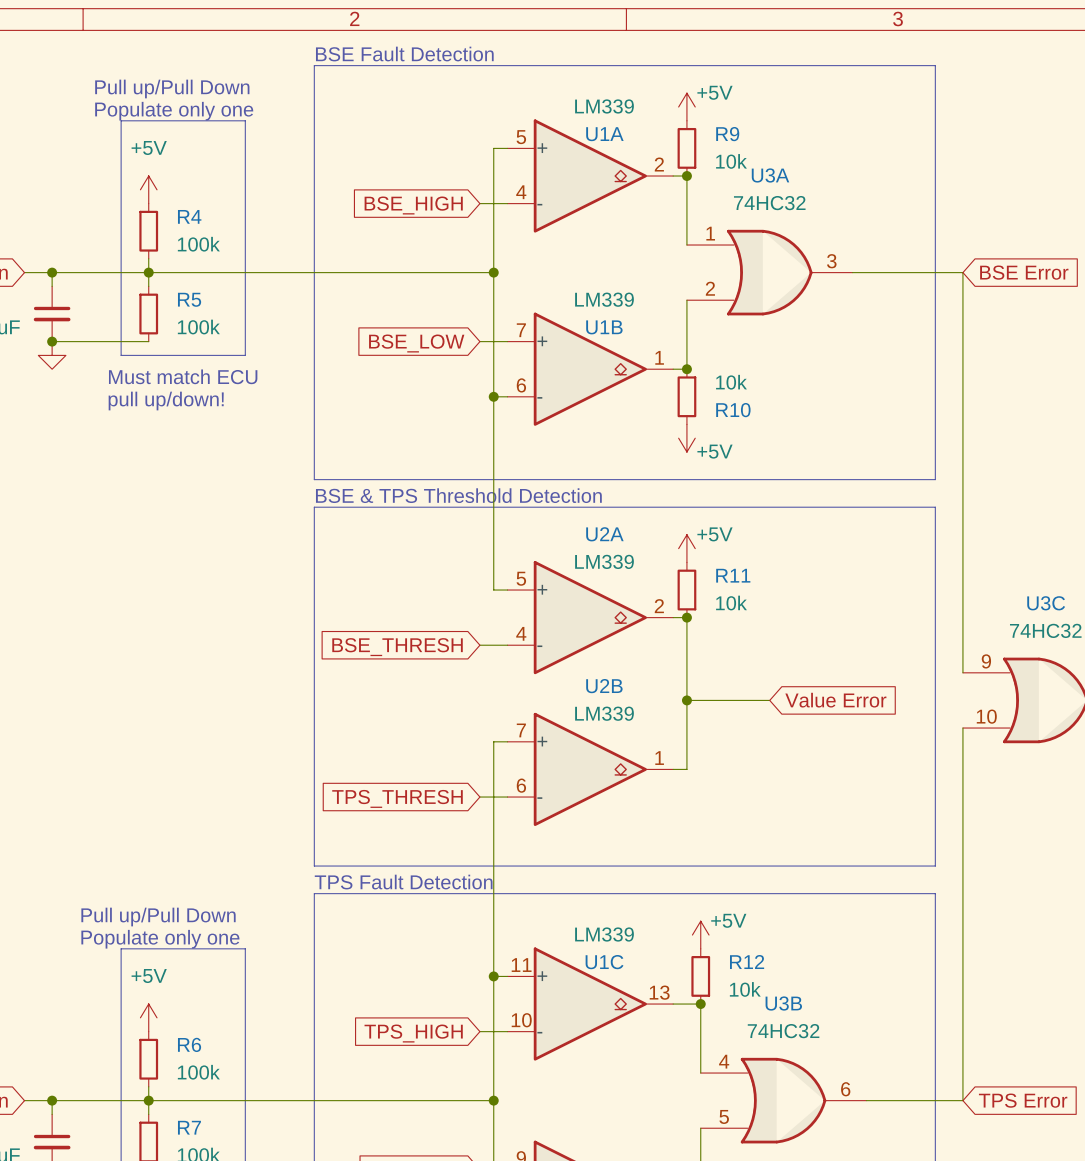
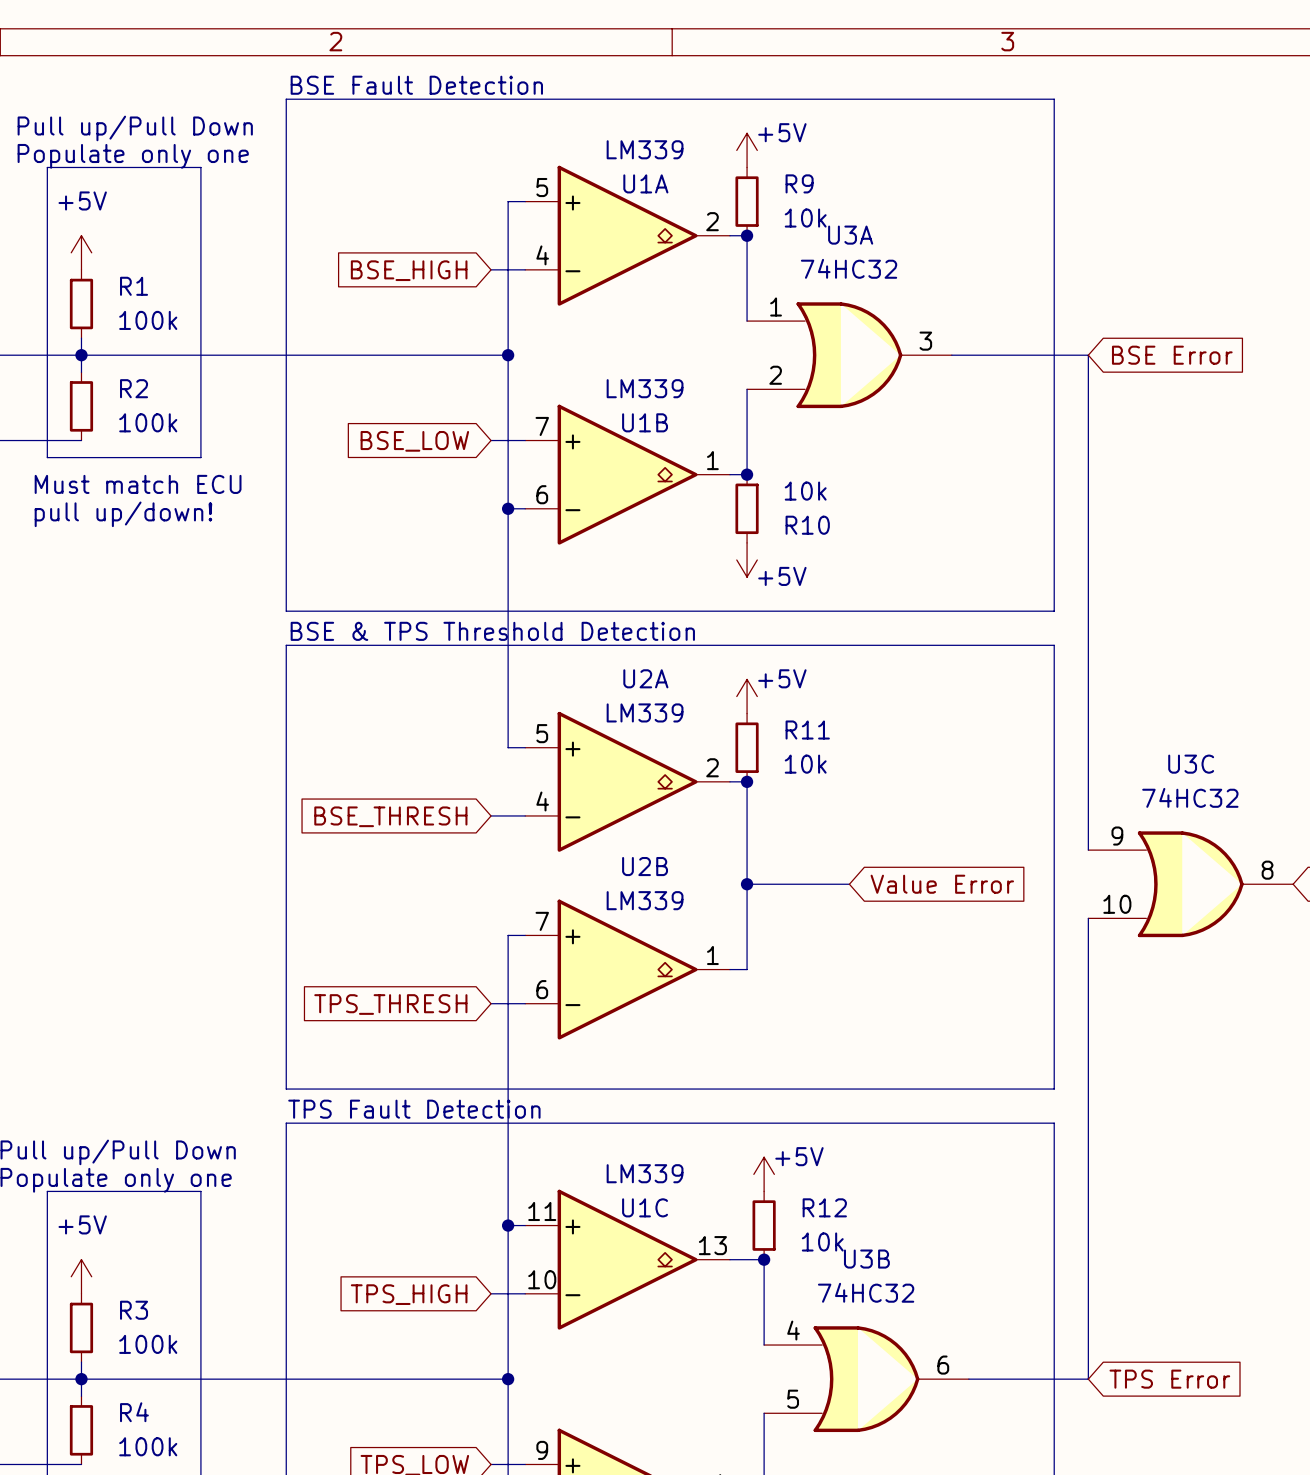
R4 name: R4 (189, 216) -> R1 (134, 286)
R5 name: R5 (189, 299) -> R2 (134, 388)
R6 name: R6 (189, 1044) -> R3 (134, 1310)
R7 name: R7 (189, 1127) -> R4 (134, 1412)

